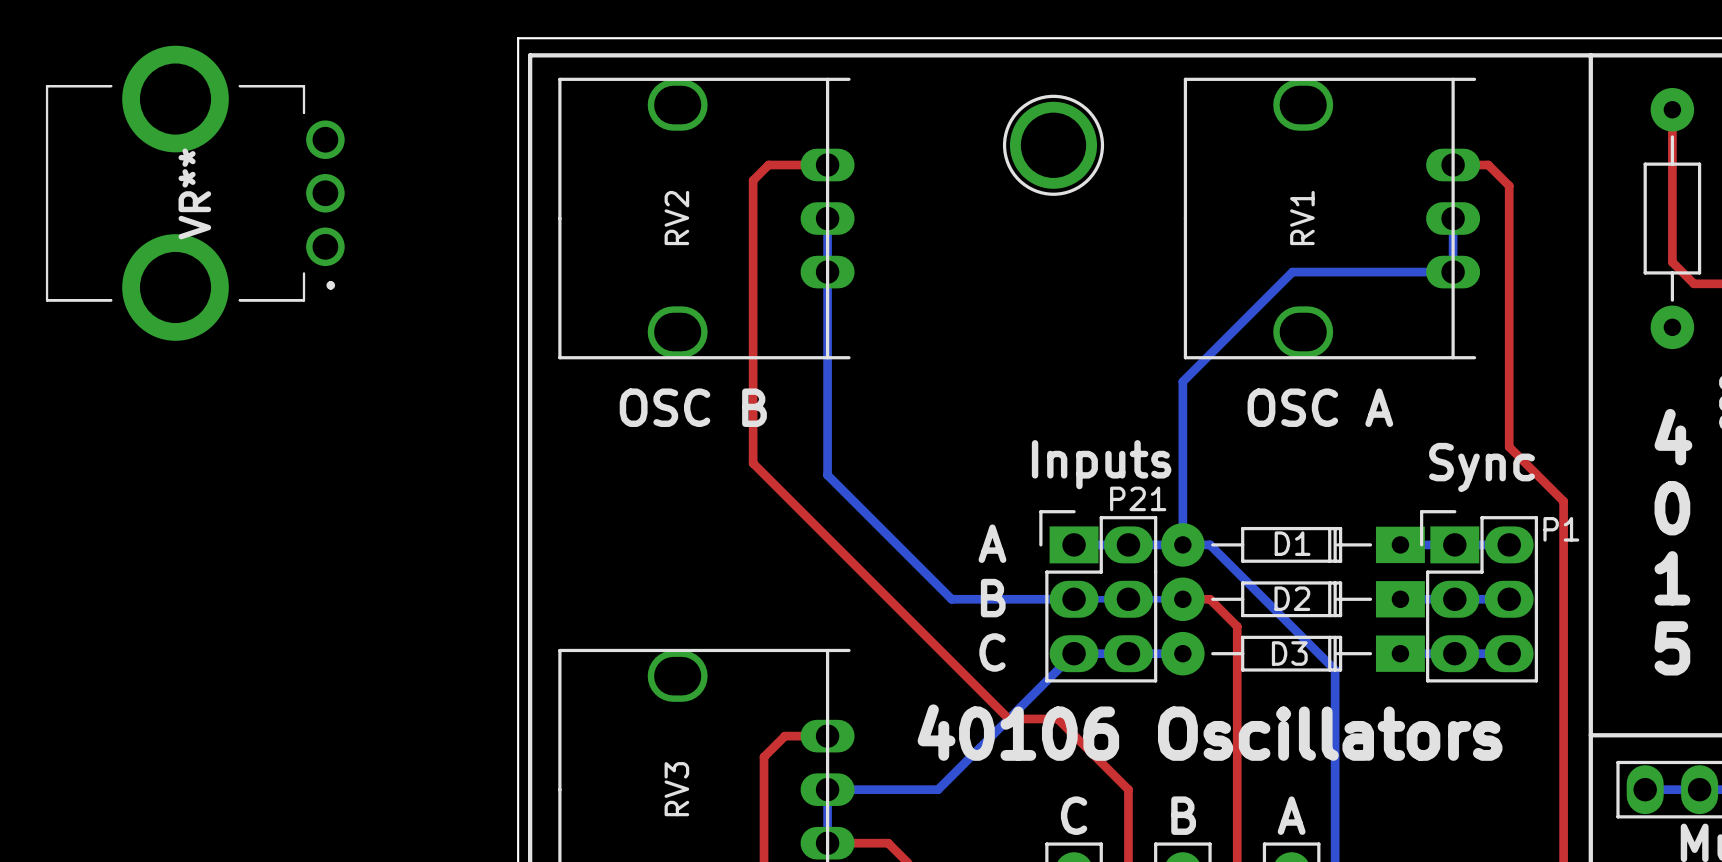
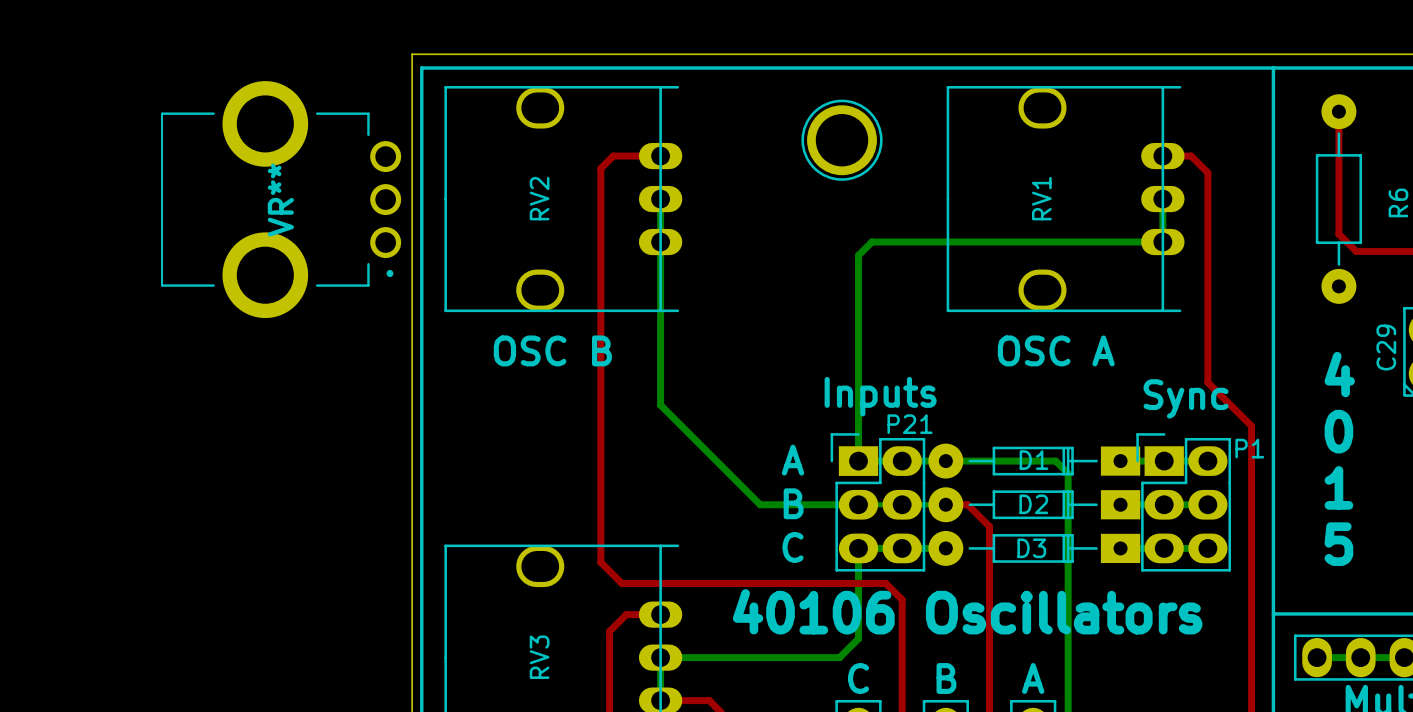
VR** position: (195, 193) -> (281, 199)
bottom track: (1292, 272) (1182, 381) (1182, 544) -> (1033, 242) (871, 242) (858, 255) (858, 461)
top track: (753, 463) (1008, 718) (1057, 718) (1128, 789) -> (600, 395) (600, 562) (621, 583) (885, 583) (902, 599) (902, 657)
bottom track: (1210, 544) (1335, 670) -> (967, 461) (1055, 461) (1068, 473) (1068, 561)
bottom track: (1074, 653) (938, 789) -> (858, 548) (858, 638) (839, 657) (749, 657)

